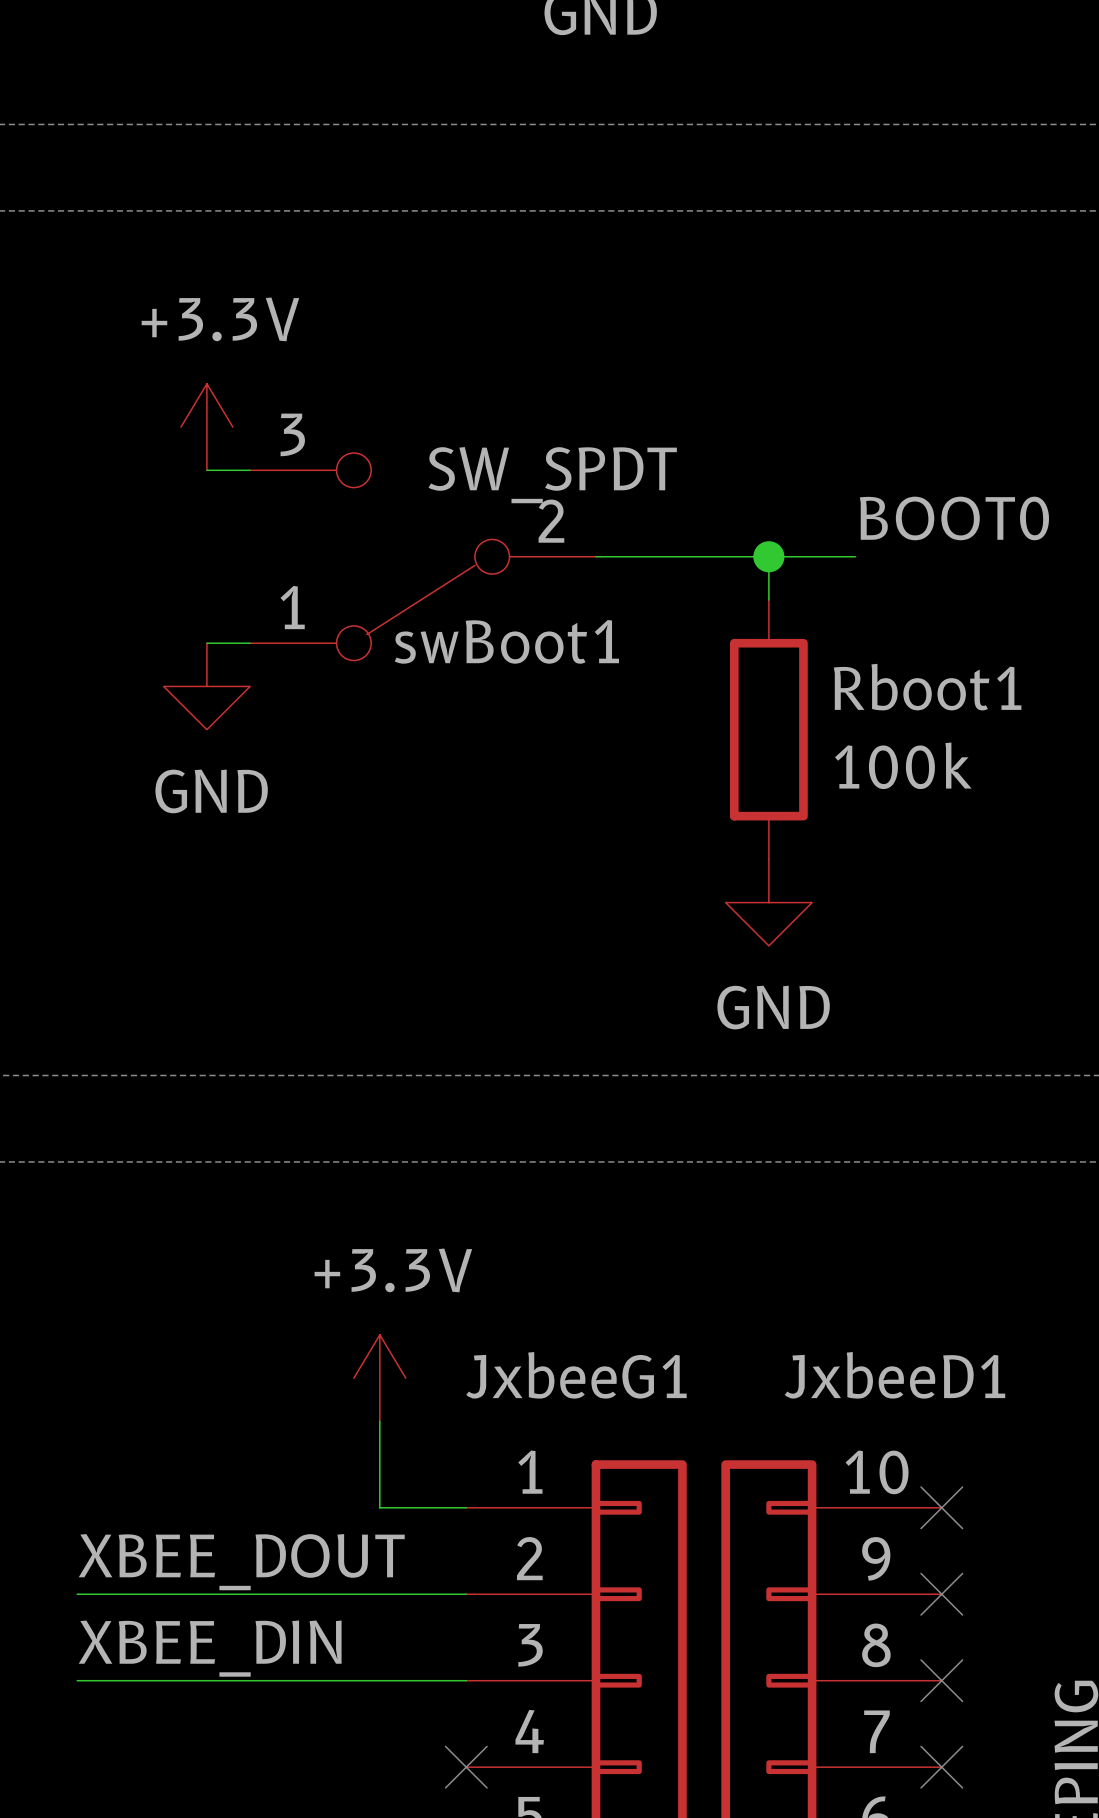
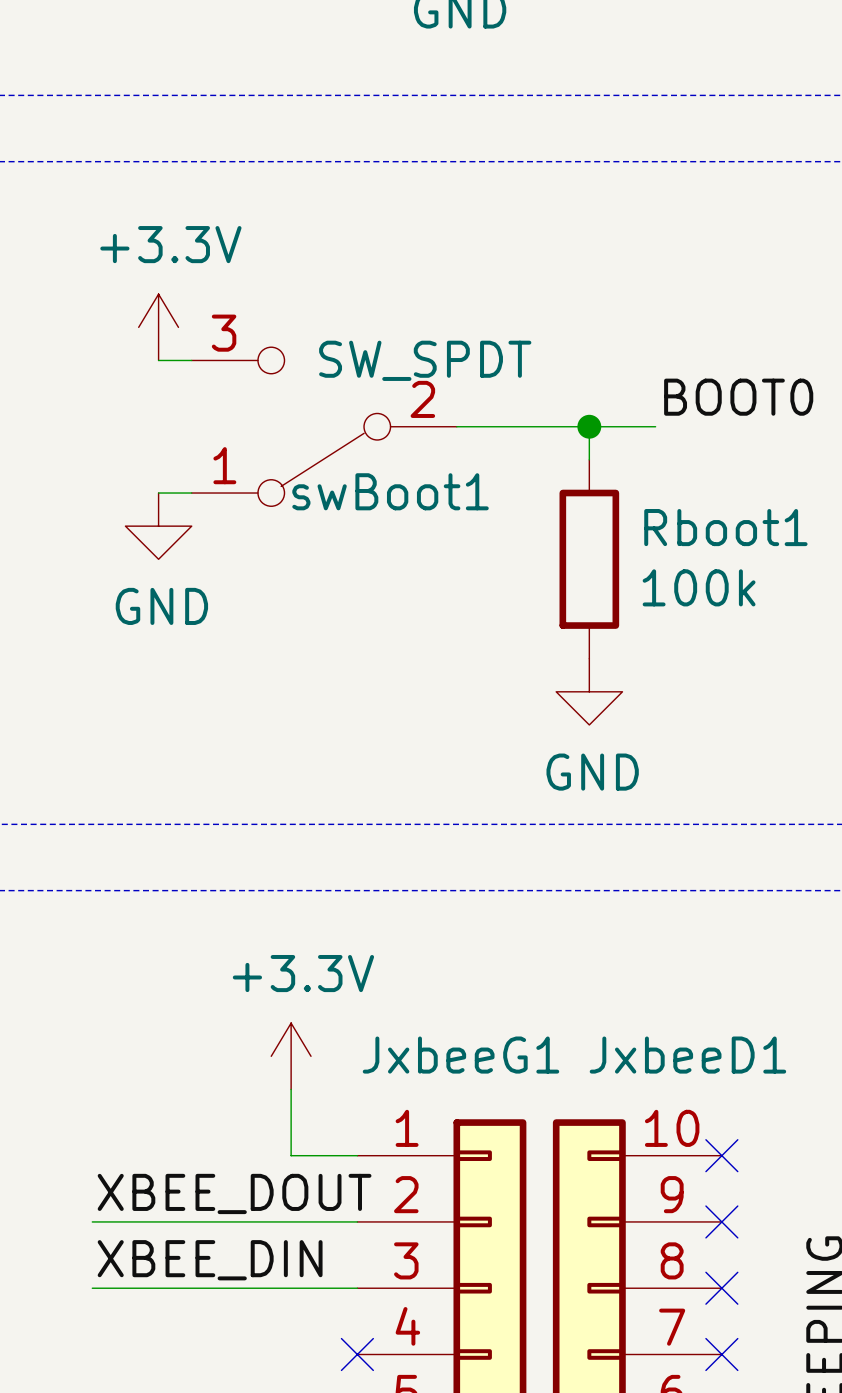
label position: XBEE_DOUT (241, 1562) -> XBEE_DOUT (234, 1193)
wire: (77, 1594) (120, 1594) -> none
label position: XBEE_DIN (210, 1648) -> XBEE_DIN (210, 1260)
wire: (77, 1680) (120, 1680) -> none

